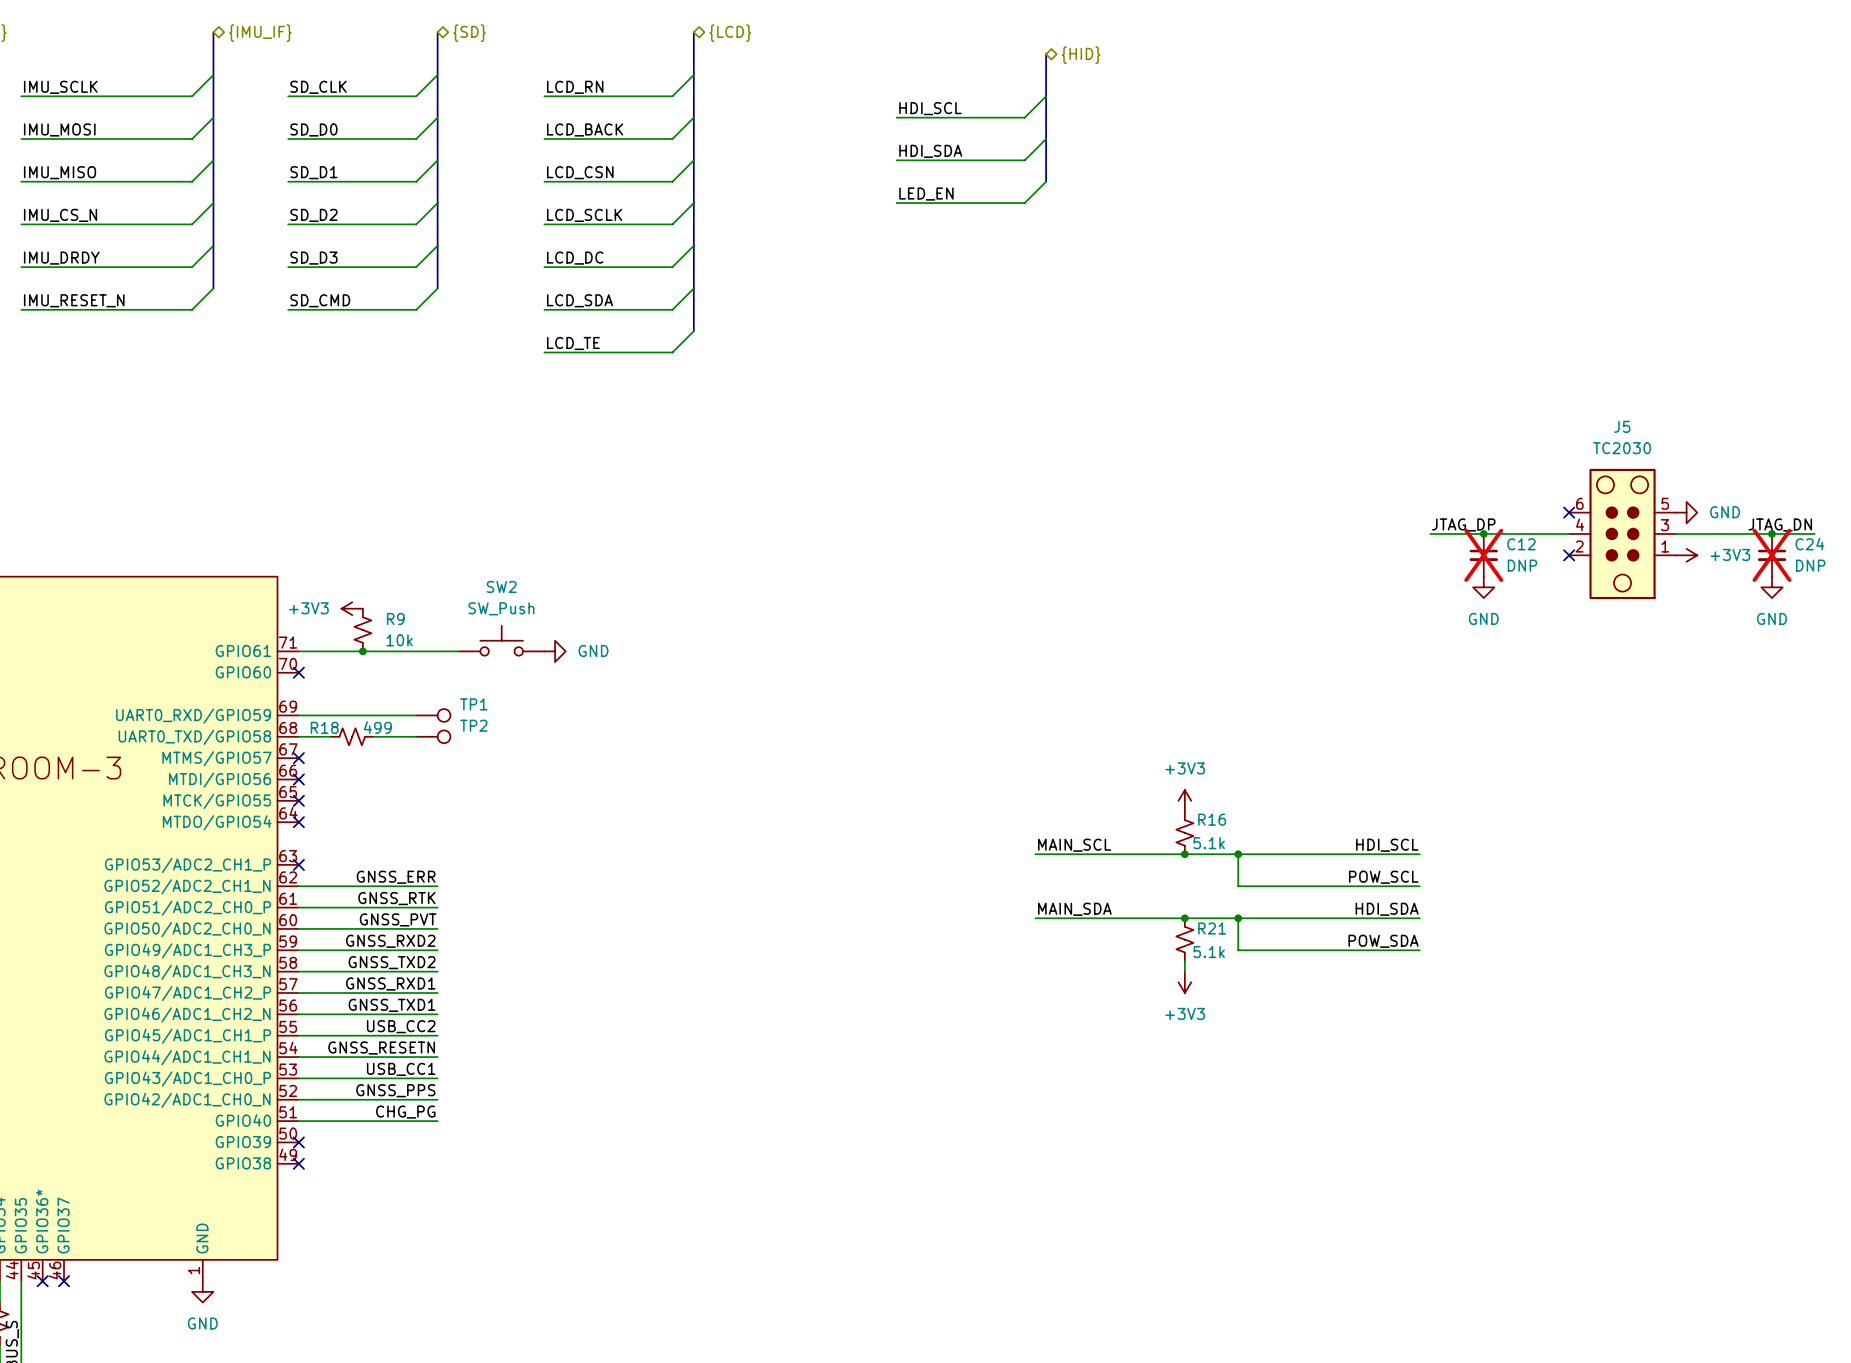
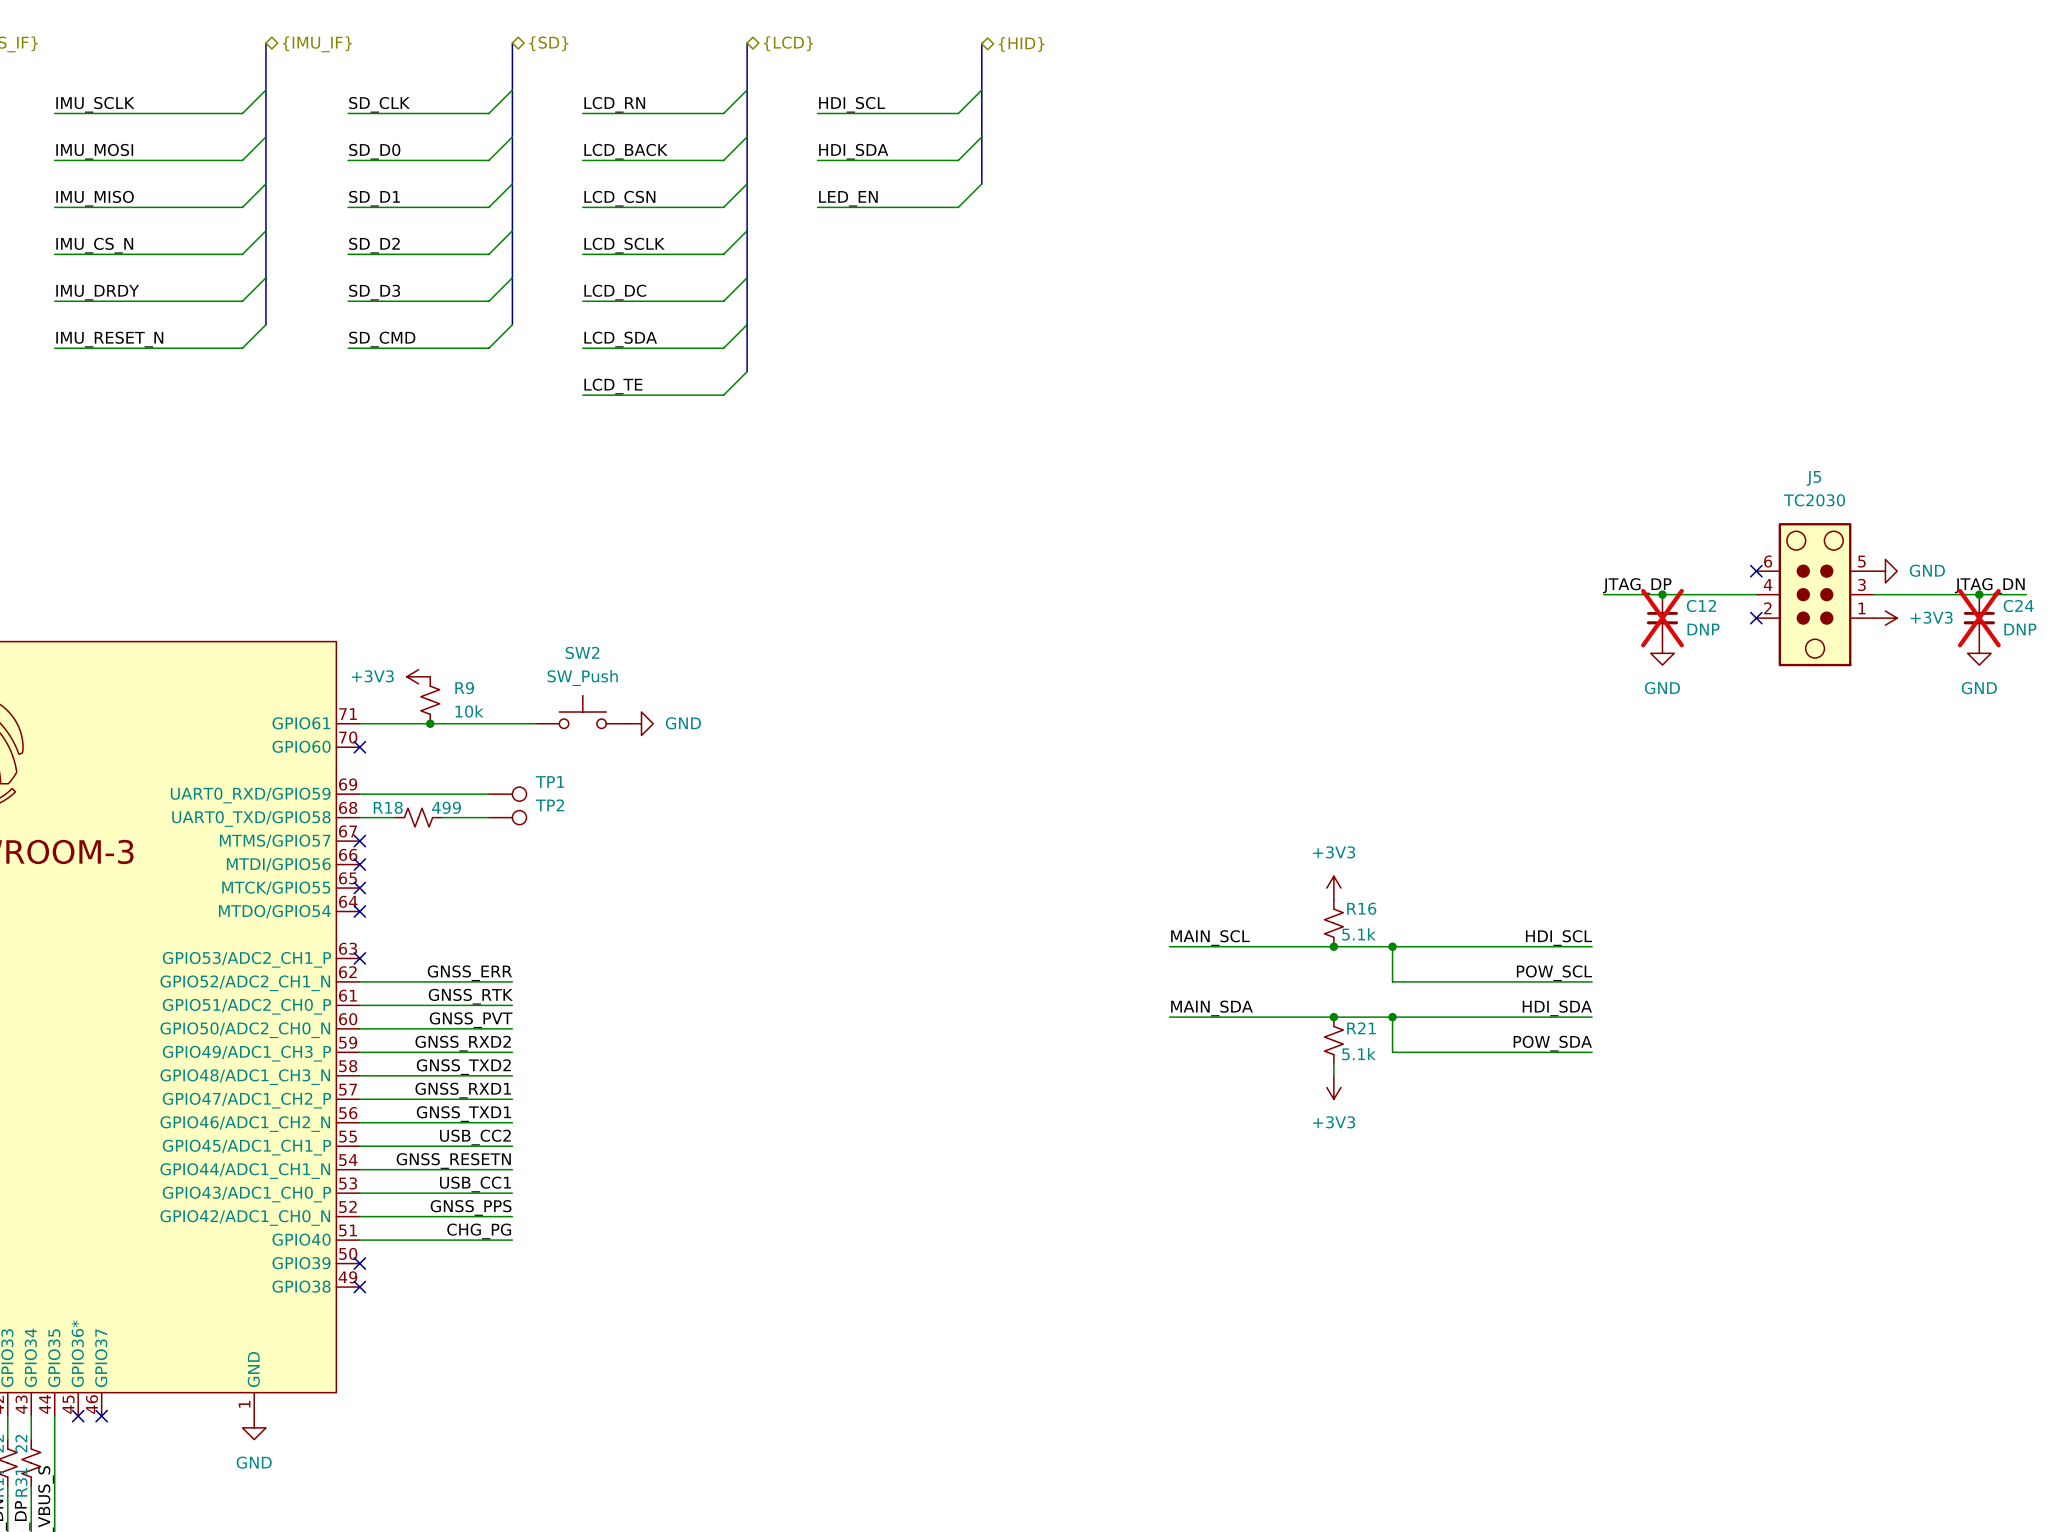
bus: (693, 32) (693, 331) -> (747, 43) (747, 371)
hierarchical label position: {LCD} (730, 33) -> {LCD} (788, 43)
bus: (1046, 53) (1046, 181) -> (981, 43) (981, 183)
hierarchical label position: {HID} (1081, 55) -> {HID} (1021, 44)
wire: (693, 74) (672, 96) (629, 96) -> (747, 90) (723, 113)
label position: LCD_RN (575, 87) -> LCD_RN (614, 104)
wire: none -> (582, 113) (629, 113)
wire: (1046, 96) (1024, 117) (896, 117) -> (981, 90) (958, 113) (817, 113)
label position: HDI_SCL (930, 108) -> HDI_SCL (852, 104)
wire: (693, 117) (672, 139) (629, 139) -> (747, 136) (723, 160)
label position: LCD_BACK (585, 129) -> LCD_BACK (626, 151)
wire: none -> (582, 160) (629, 160)
wire: (1046, 139) (1024, 160) (896, 160) -> (981, 136) (958, 160) (817, 160)
label position: HDI_SDA (930, 151) -> HDI_SDA (853, 151)
wire: (693, 160) (672, 181) (629, 181) -> (747, 183) (723, 207)
label position: LCD_CSN (580, 172) -> LCD_CSN (619, 198)
wire: none -> (582, 207) (629, 207)
wire: (1046, 181) (1024, 203) (896, 203) -> (981, 183) (958, 207) (817, 207)
label position: LED_EN (926, 194) -> LED_EN (848, 198)
wire: (693, 203) (672, 224) (629, 224) -> (747, 230) (723, 254)
label position: LCD_SCLK (584, 215) -> LCD_SCLK (624, 245)
wire: none -> (582, 254) (629, 254)
wire: (693, 245) (672, 267) (629, 267) -> (747, 277) (723, 301)
label position: LCD_DC (575, 258) -> LCD_DC (615, 292)
wire: none -> (582, 301) (629, 301)
wire: (693, 288) (672, 309) (629, 309) -> (747, 324) (723, 348)
label position: LCD_SDA (580, 300) -> LCD_SDA (620, 339)
wire: none -> (582, 348) (629, 348)
wire: (693, 331) (672, 352) (629, 352) -> (747, 371) (723, 395)
label position: LCD_TE (573, 343) -> LCD_TE (613, 386)
wire: none -> (582, 395) (629, 395)

